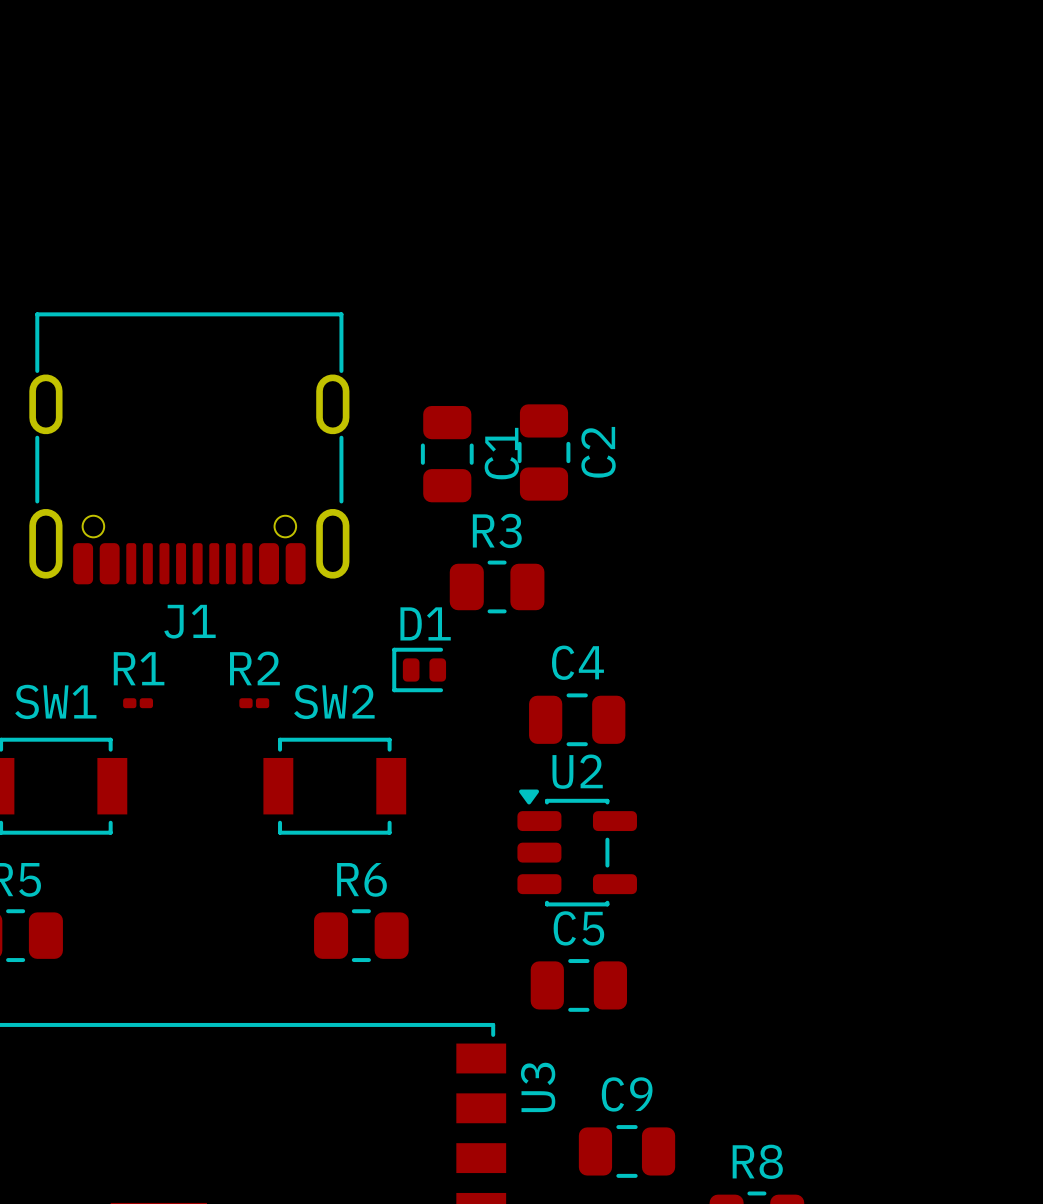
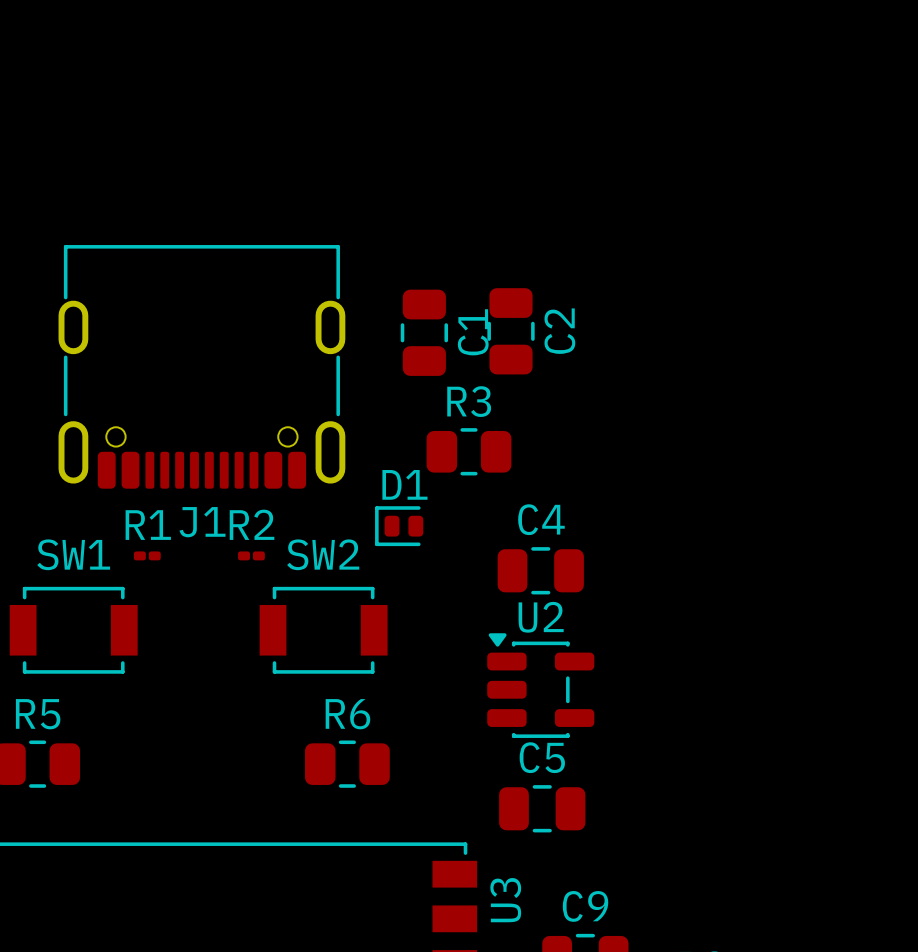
J1 position: (189, 448) -> (201, 366)

